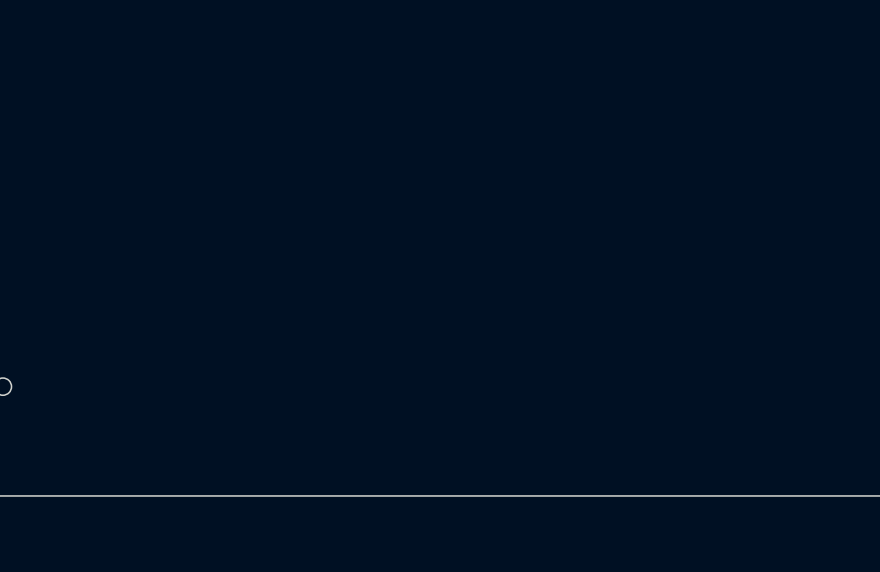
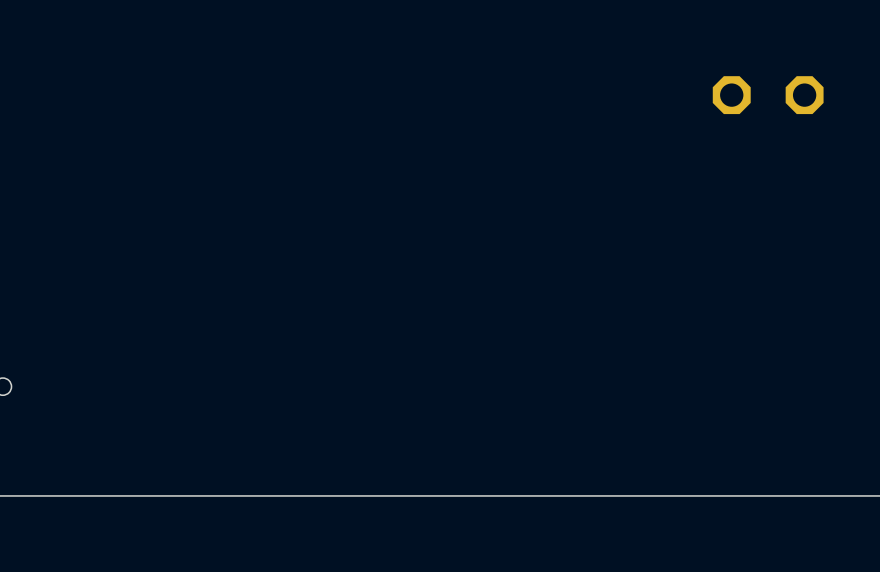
part: none -> (768, 95)

